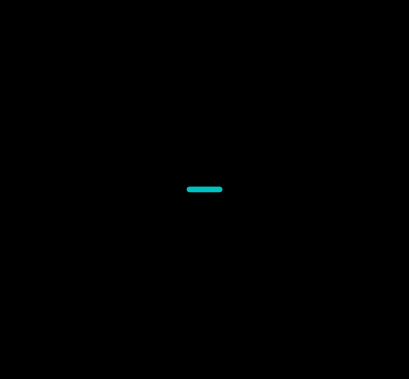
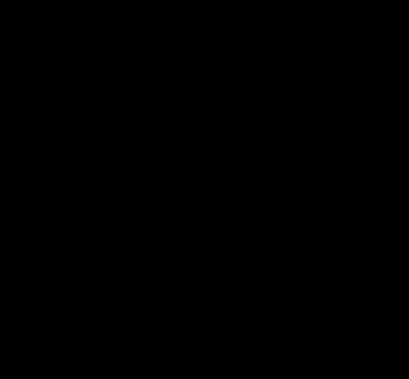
line: (189, 189) (219, 189) -> none

